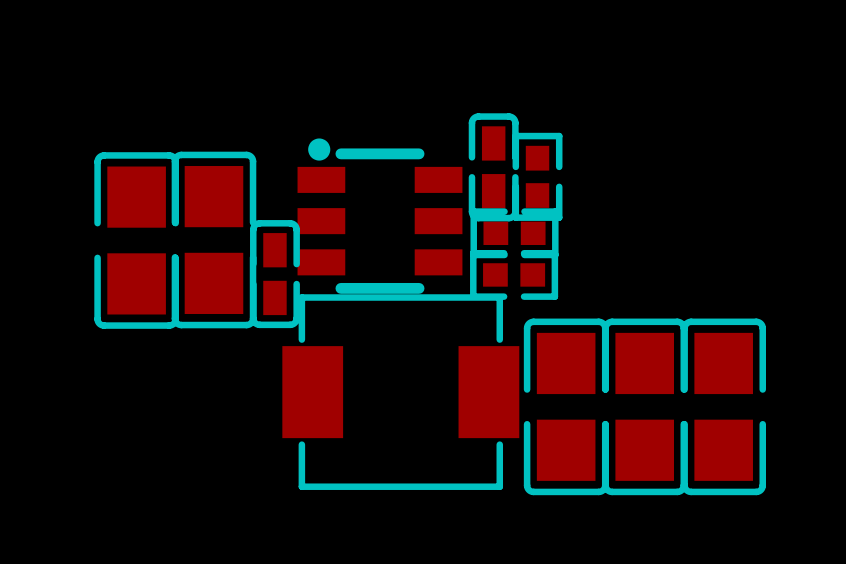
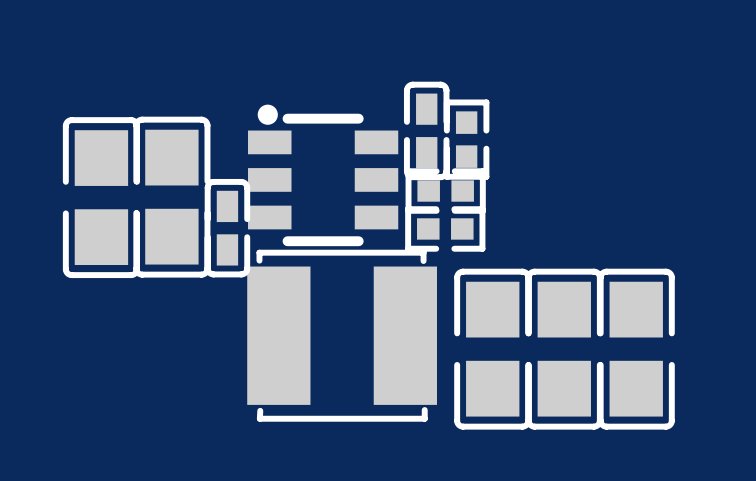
part footprint: [282, 294, 520, 490] -> [247, 249, 437, 422]

